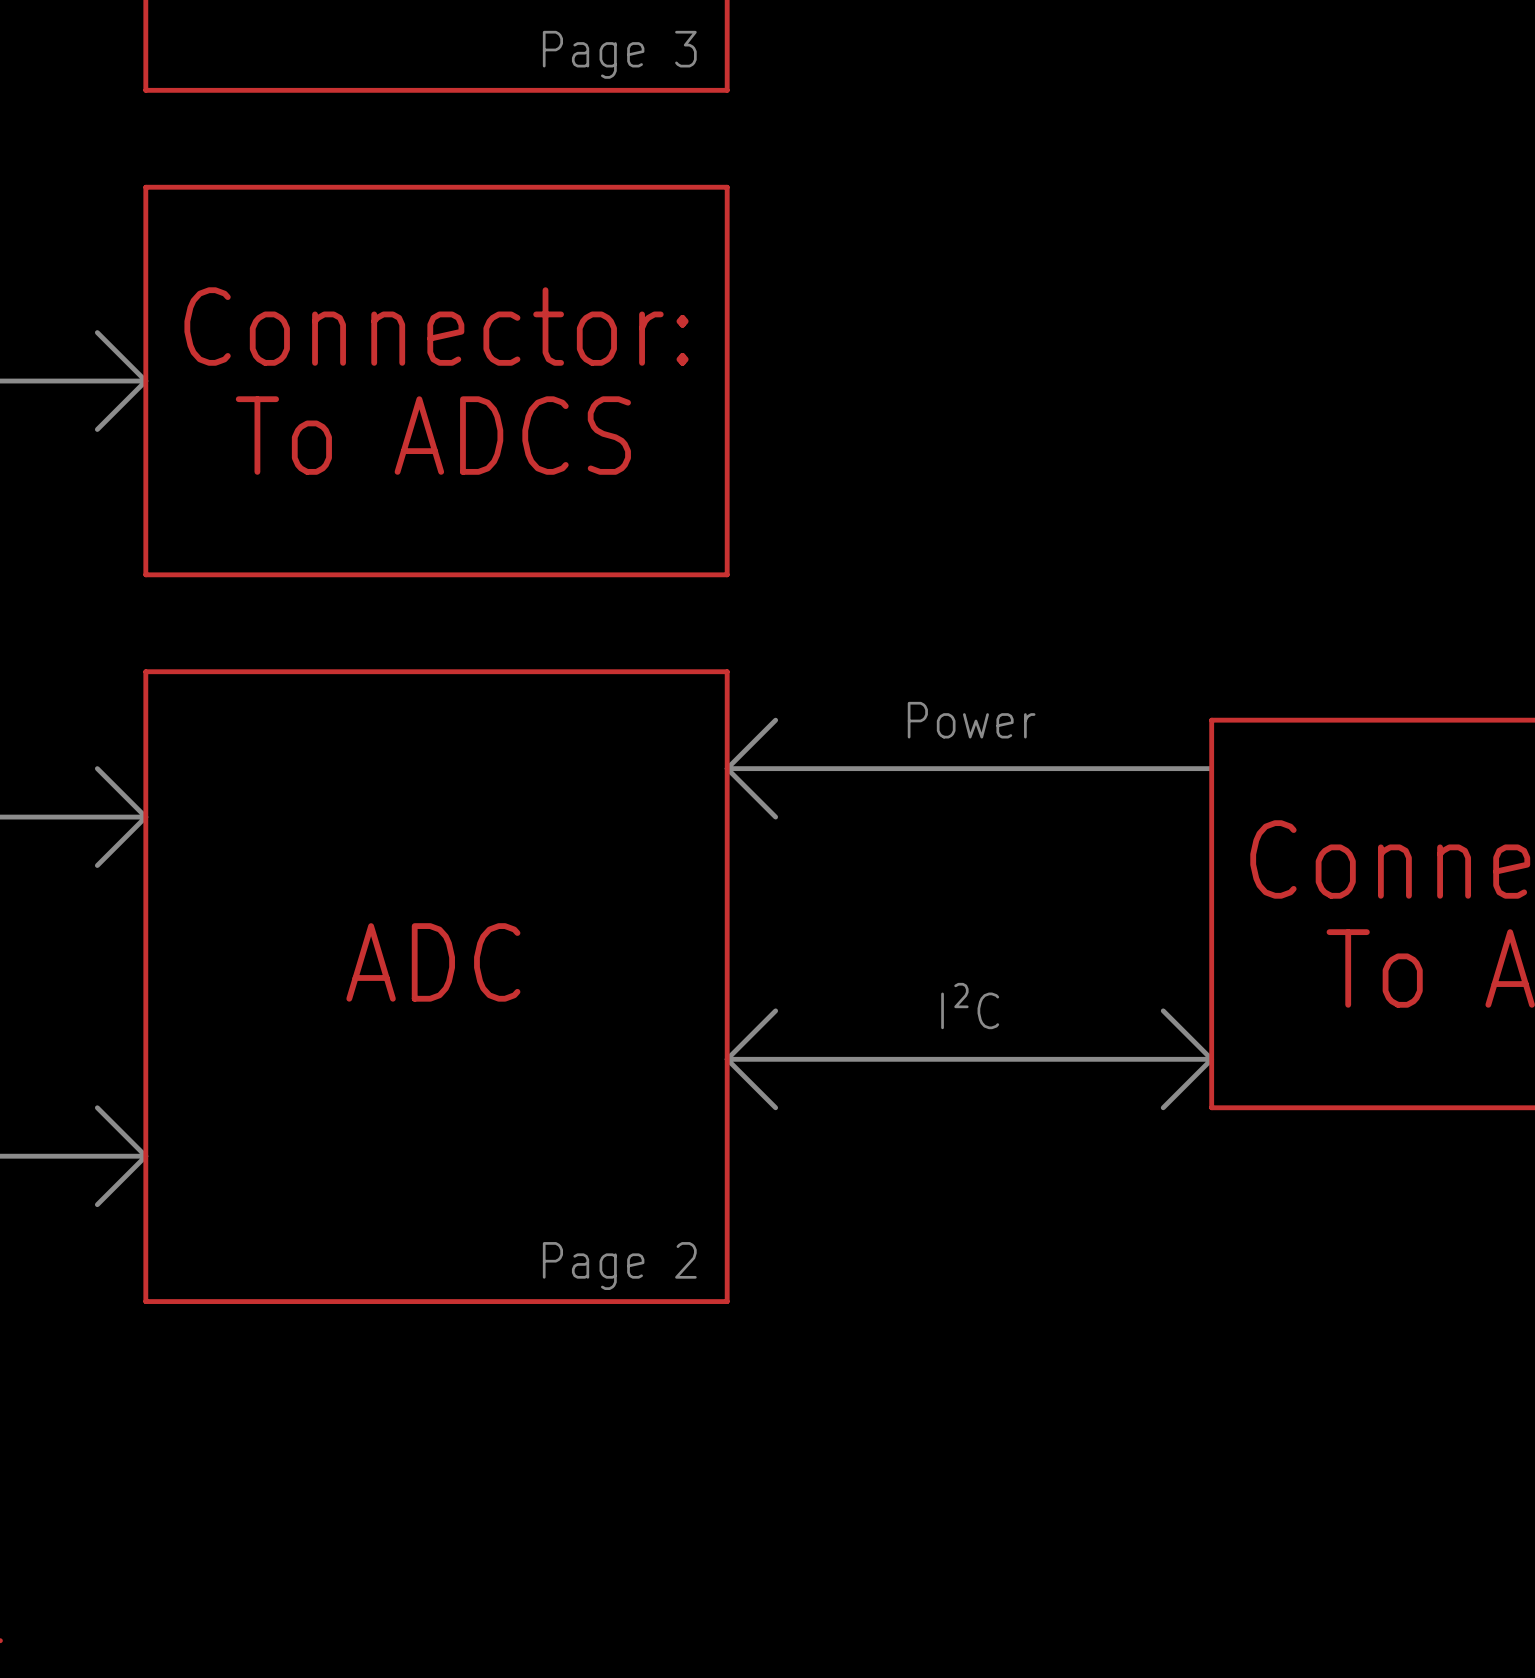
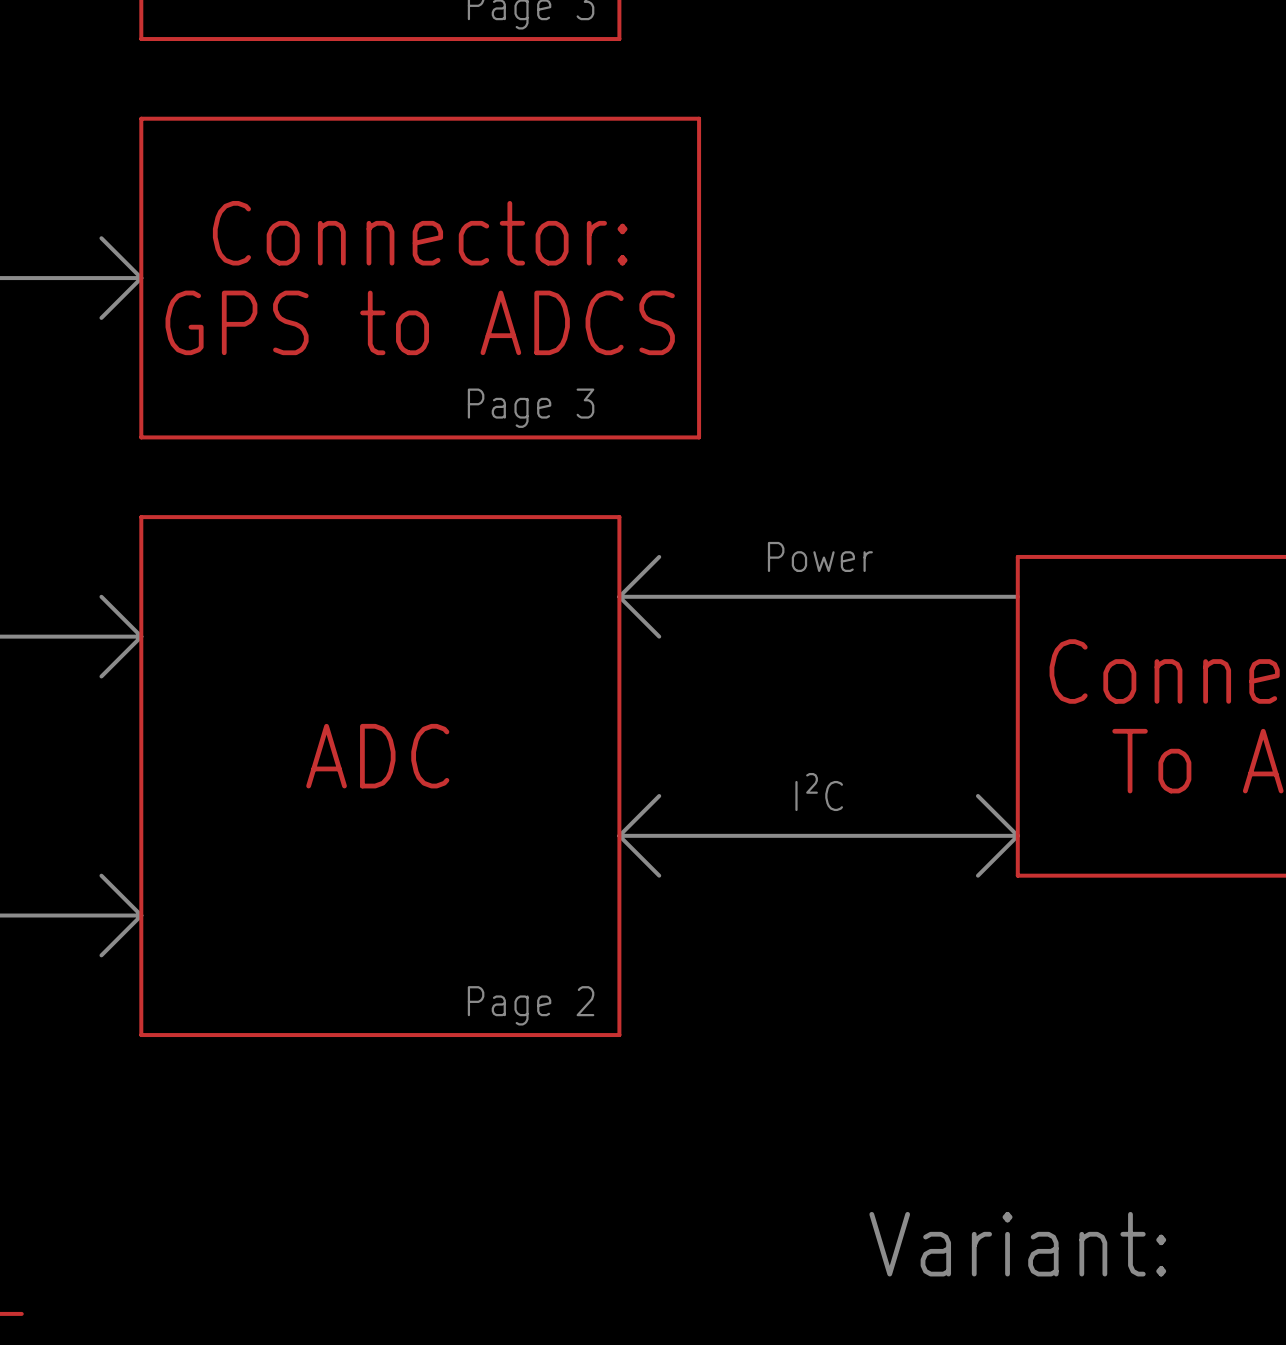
line: (727, 187) (727, 574) -> (619, 118) (699, 118) (699, 437) (619, 437)
text position: Connector: (436, 326) -> Connector: (420, 233)
text: To ADCS (433, 435) -> GPS to ADCS (420, 322)
text: none -> Page 3 (531, 408)
text: none -> Variant: (1017, 1244)

